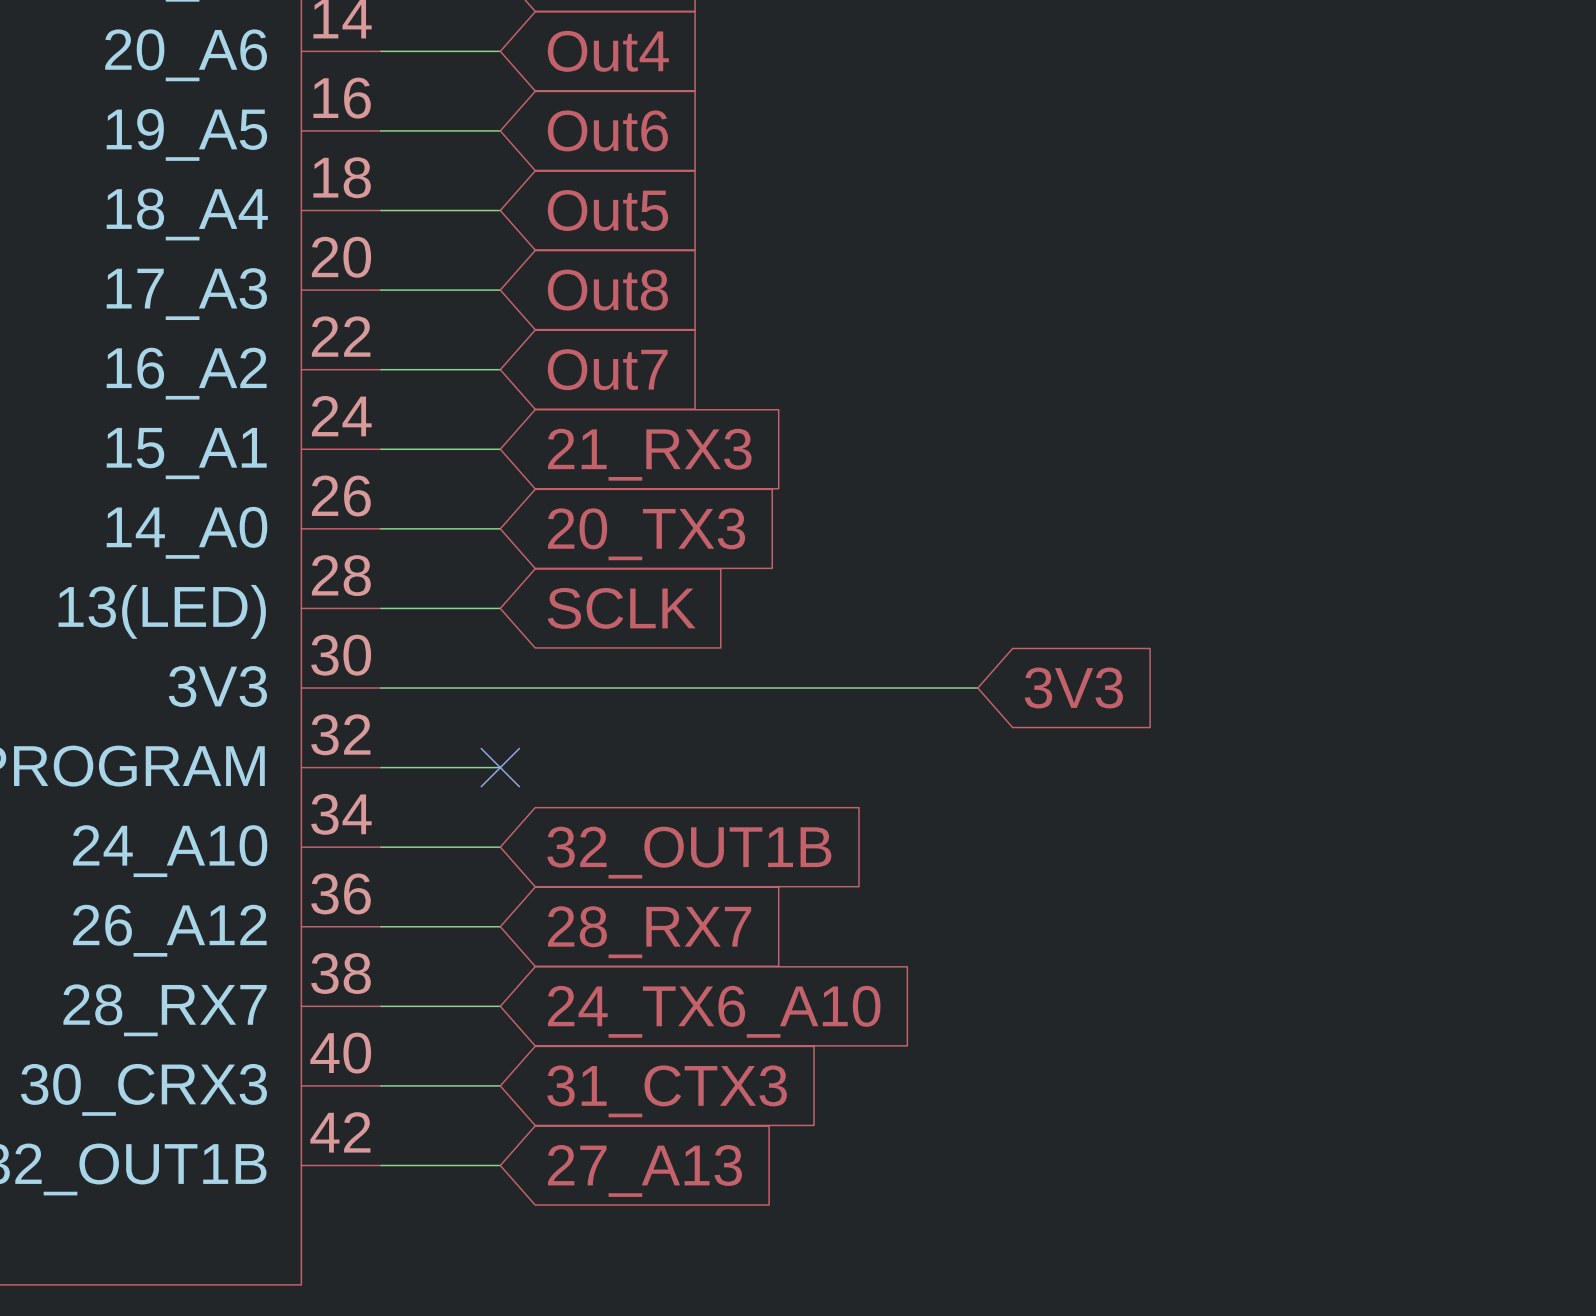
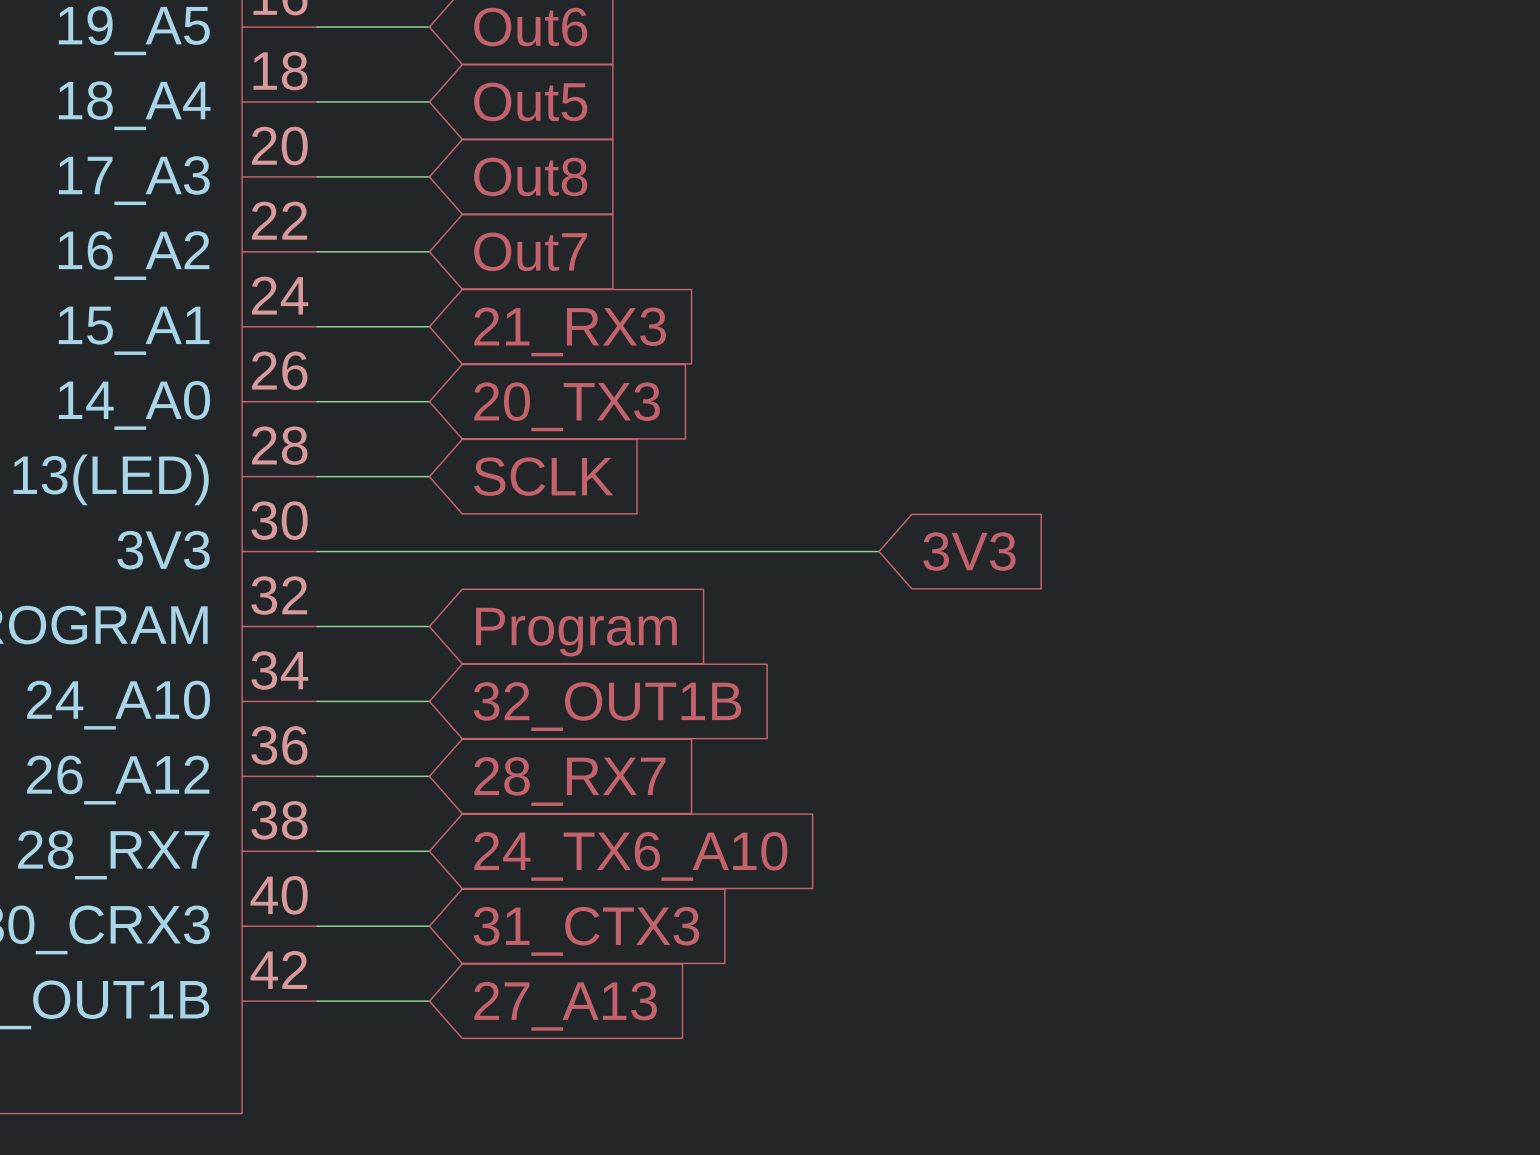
no-connect mark: (500, 767) -> none
global label: none -> Program (576, 632)

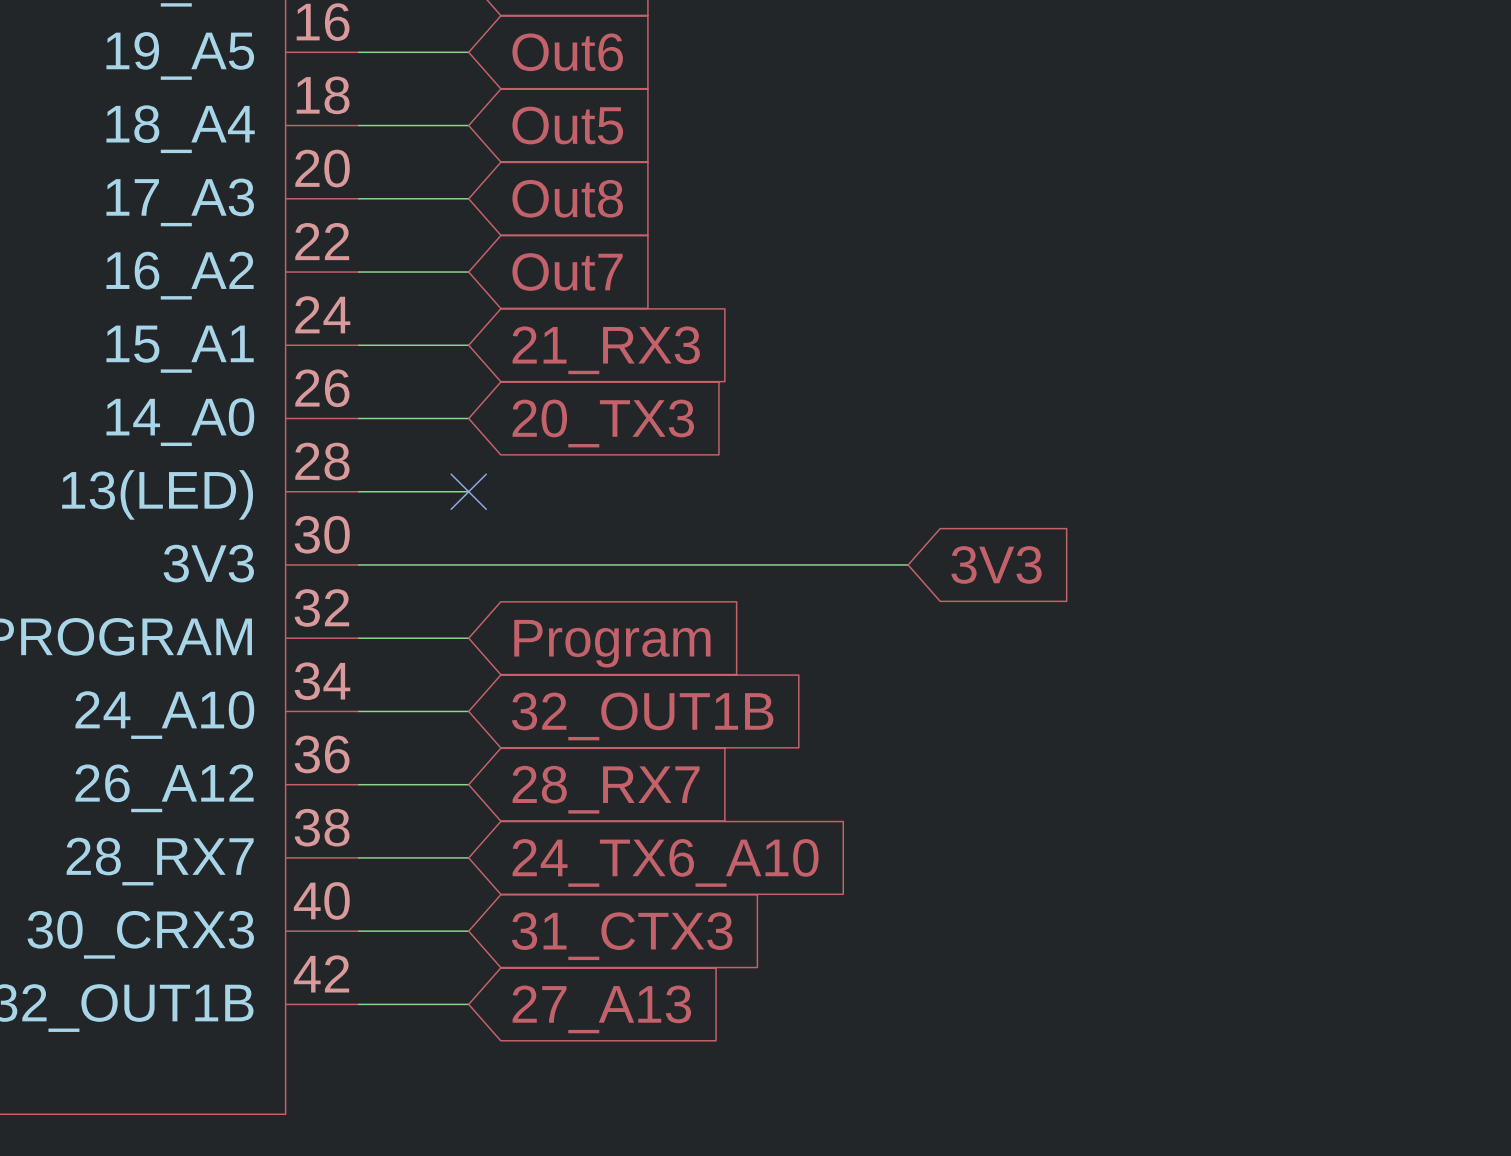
no-connect mark: none -> (468, 491)
global label: SCLK (543, 476) -> none

